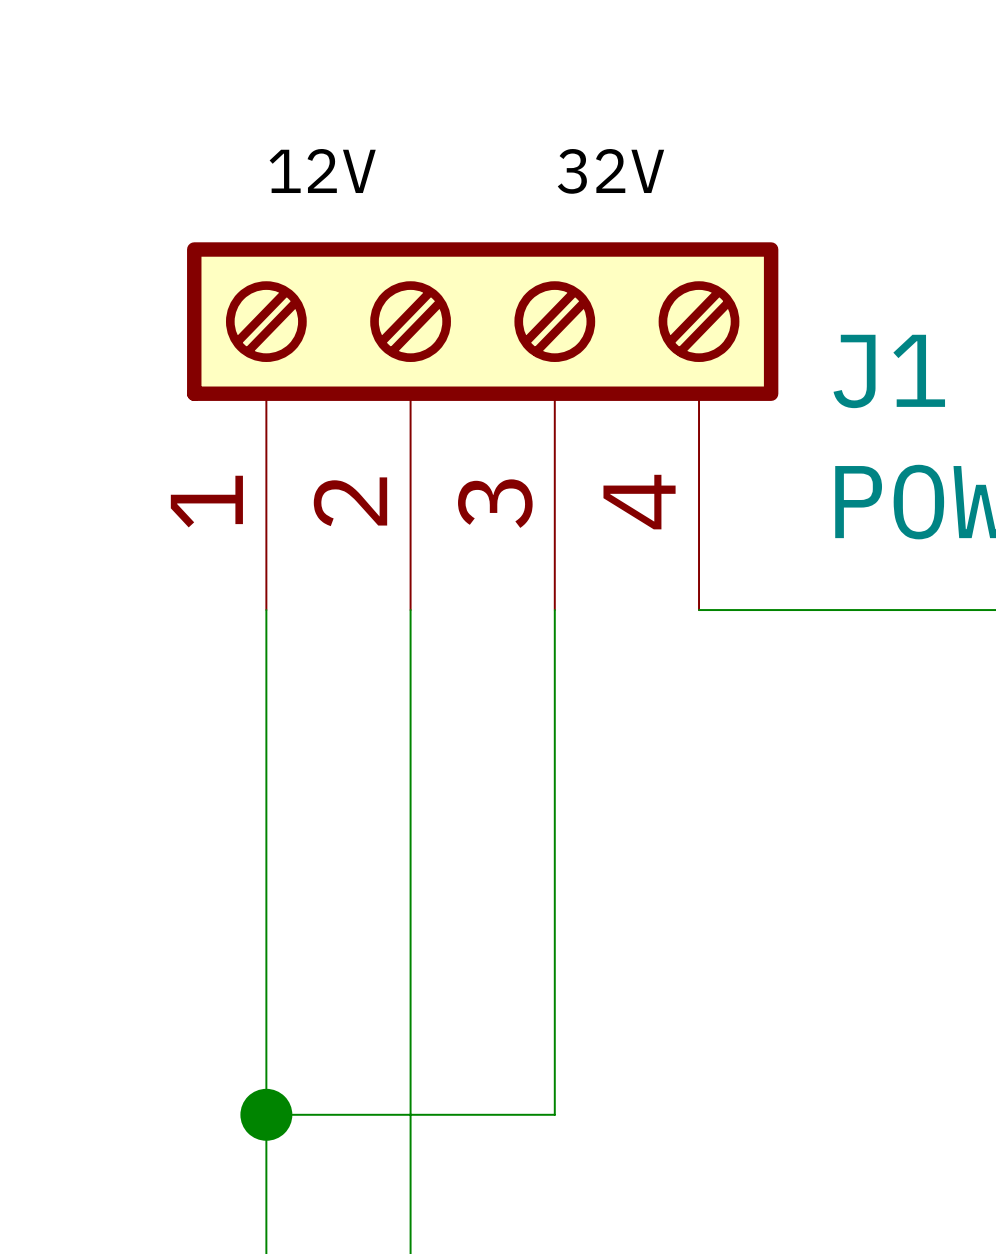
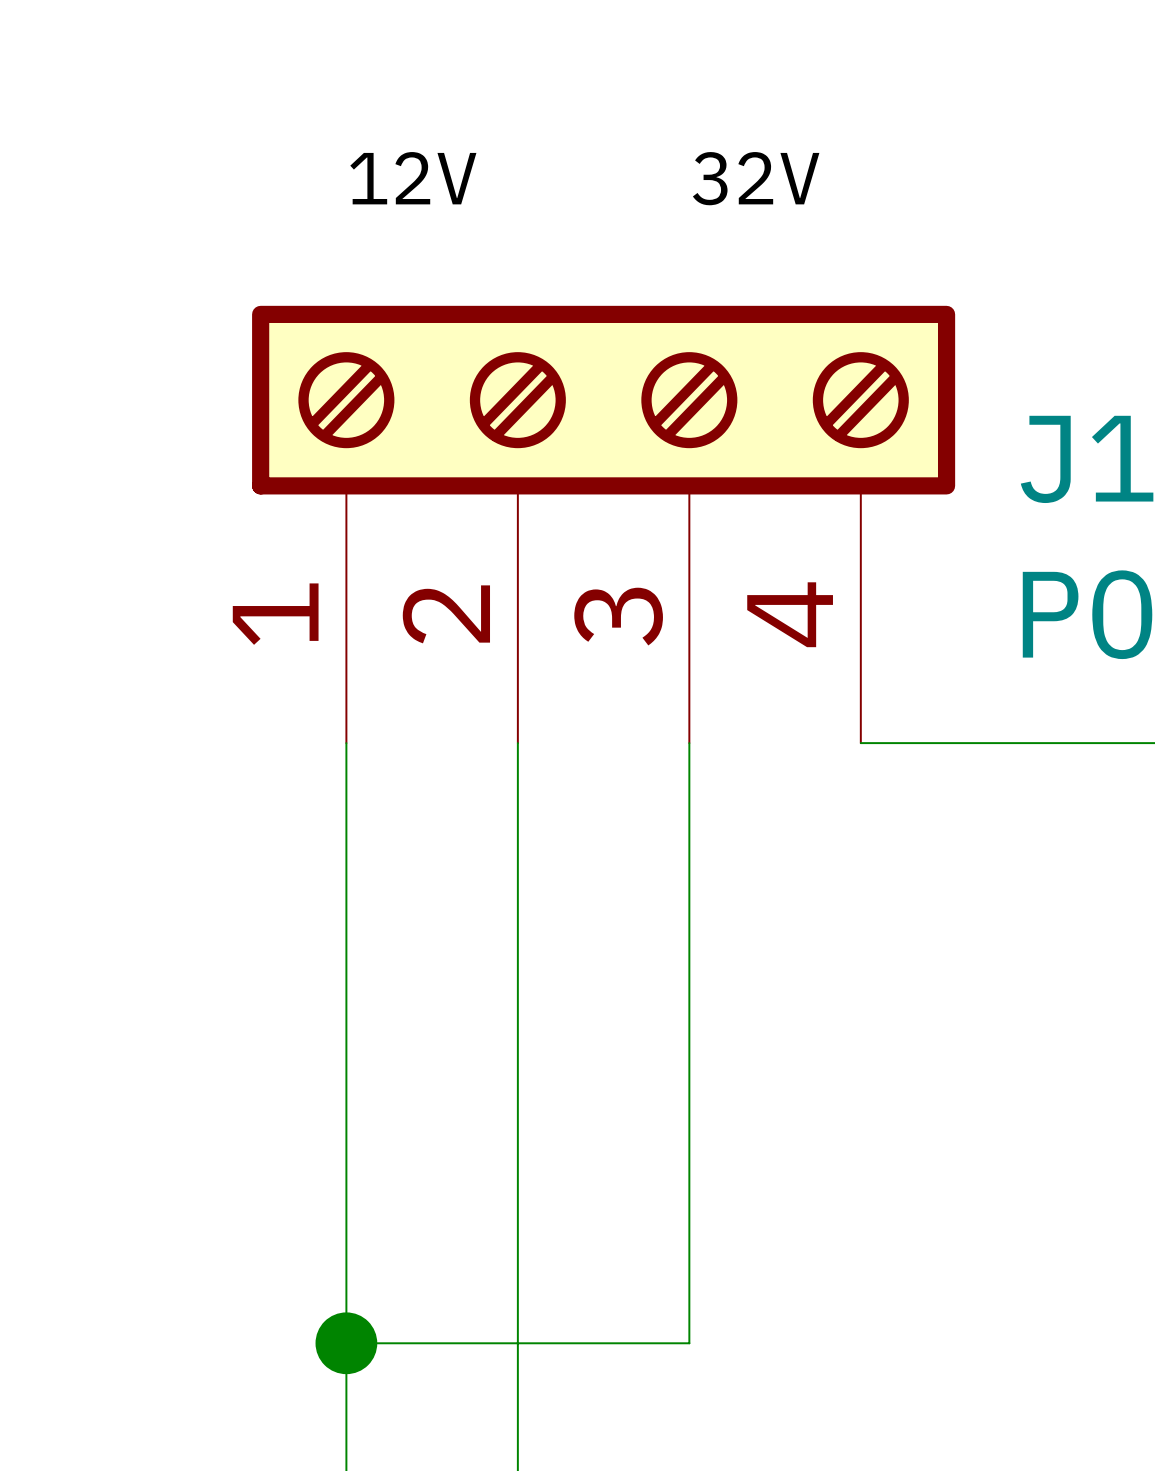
label position: 12V (322, 171) -> 12V (413, 178)
label position: 32V (610, 171) -> 32V (756, 178)

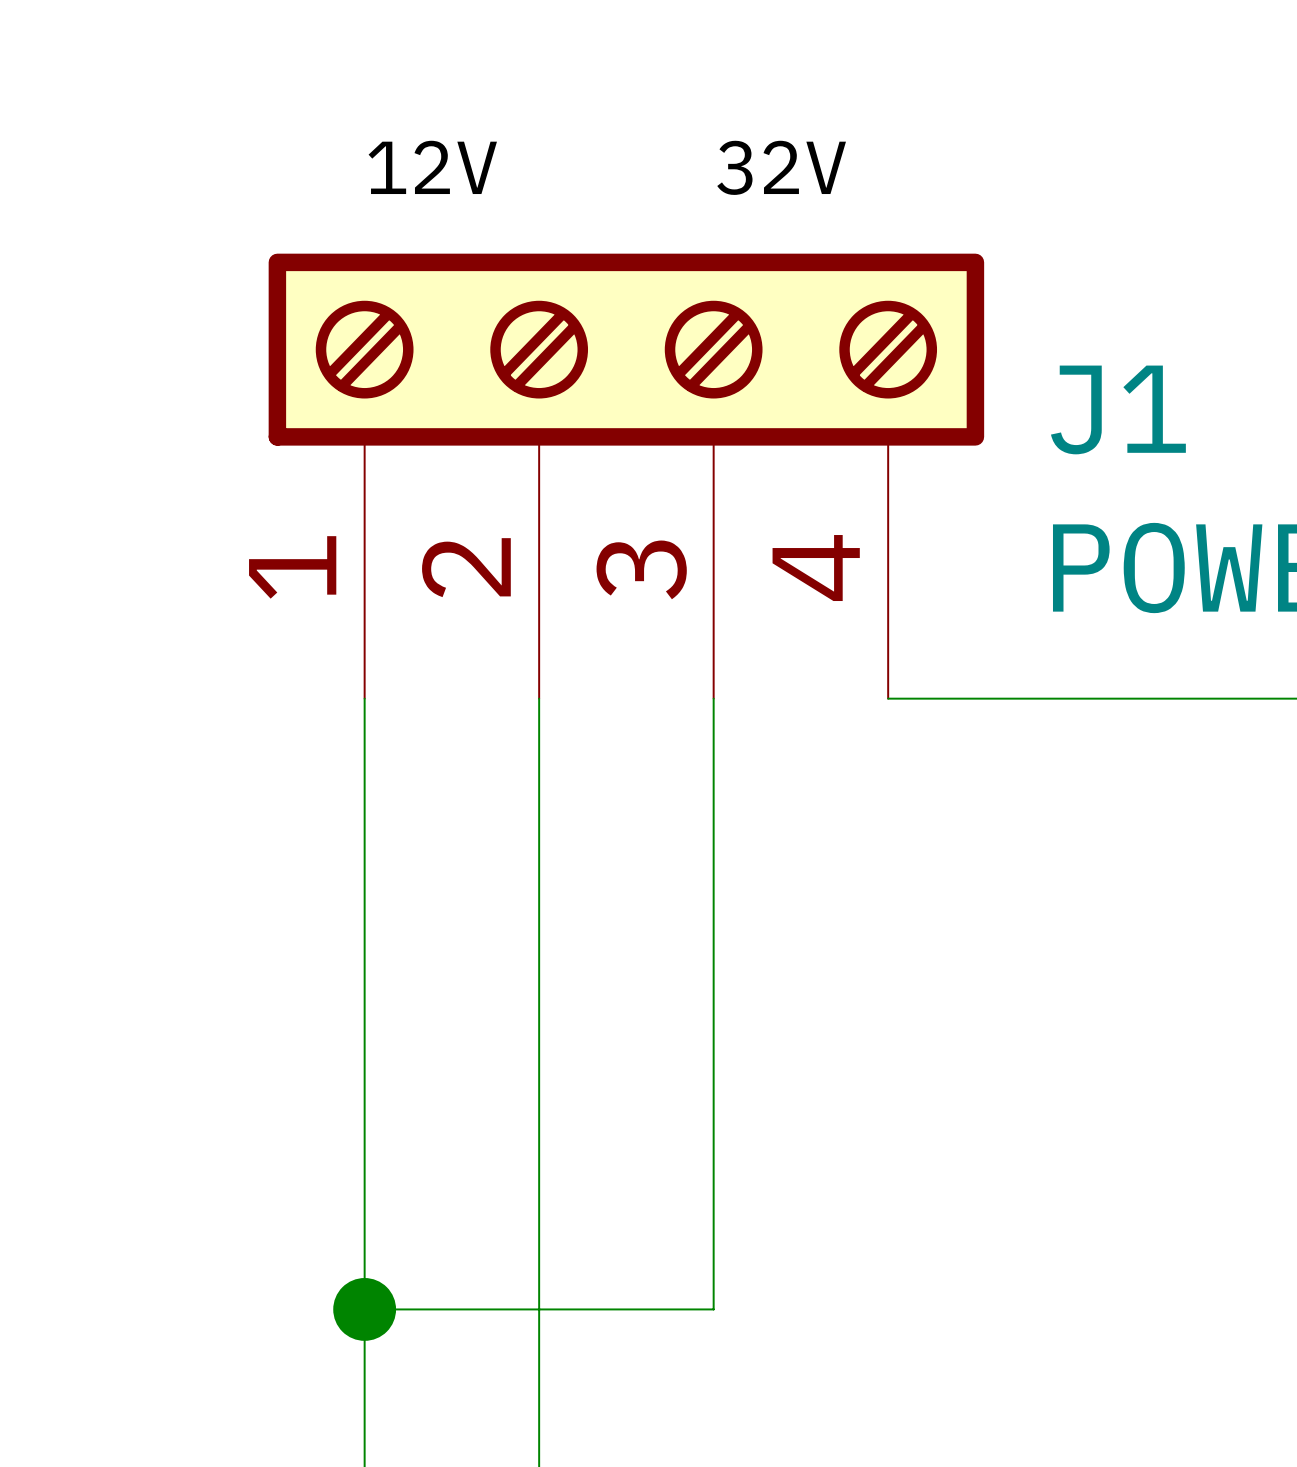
label position: 12V (413, 178) -> 12V (432, 167)
label position: 32V (756, 178) -> 32V (781, 167)

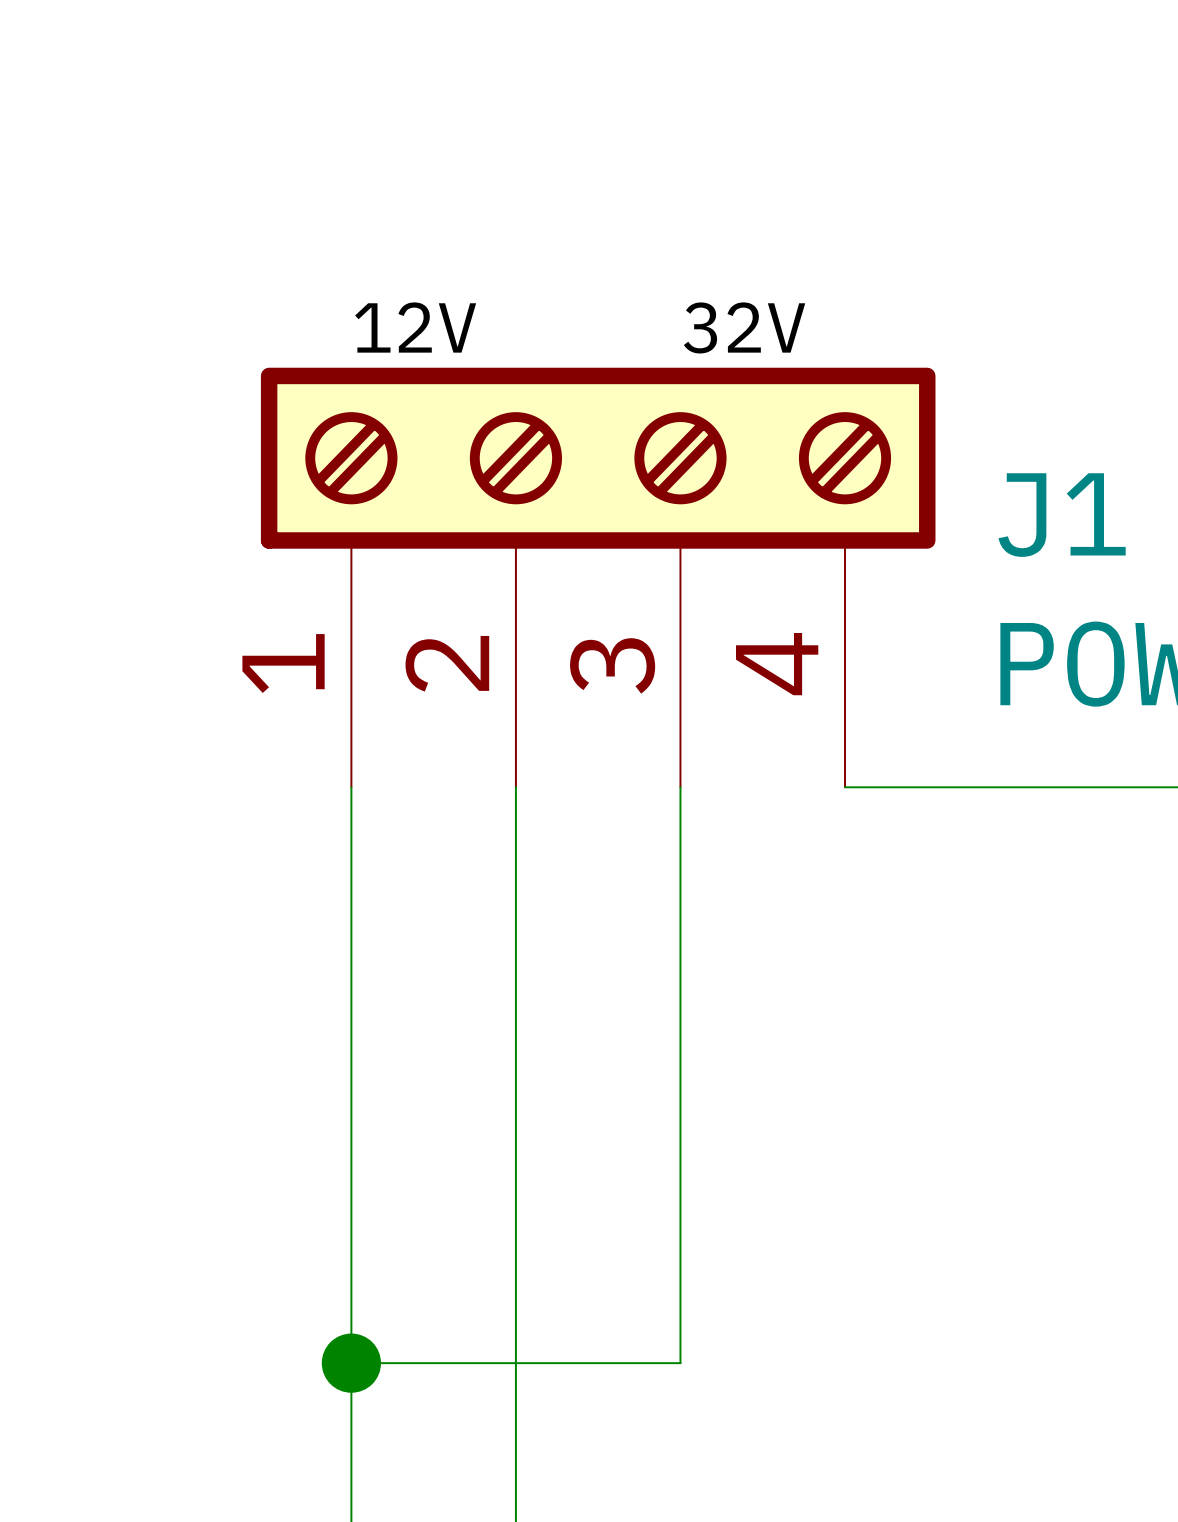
label position: 12V (432, 167) -> 12V (415, 327)
label position: 32V (781, 167) -> 32V (744, 327)

